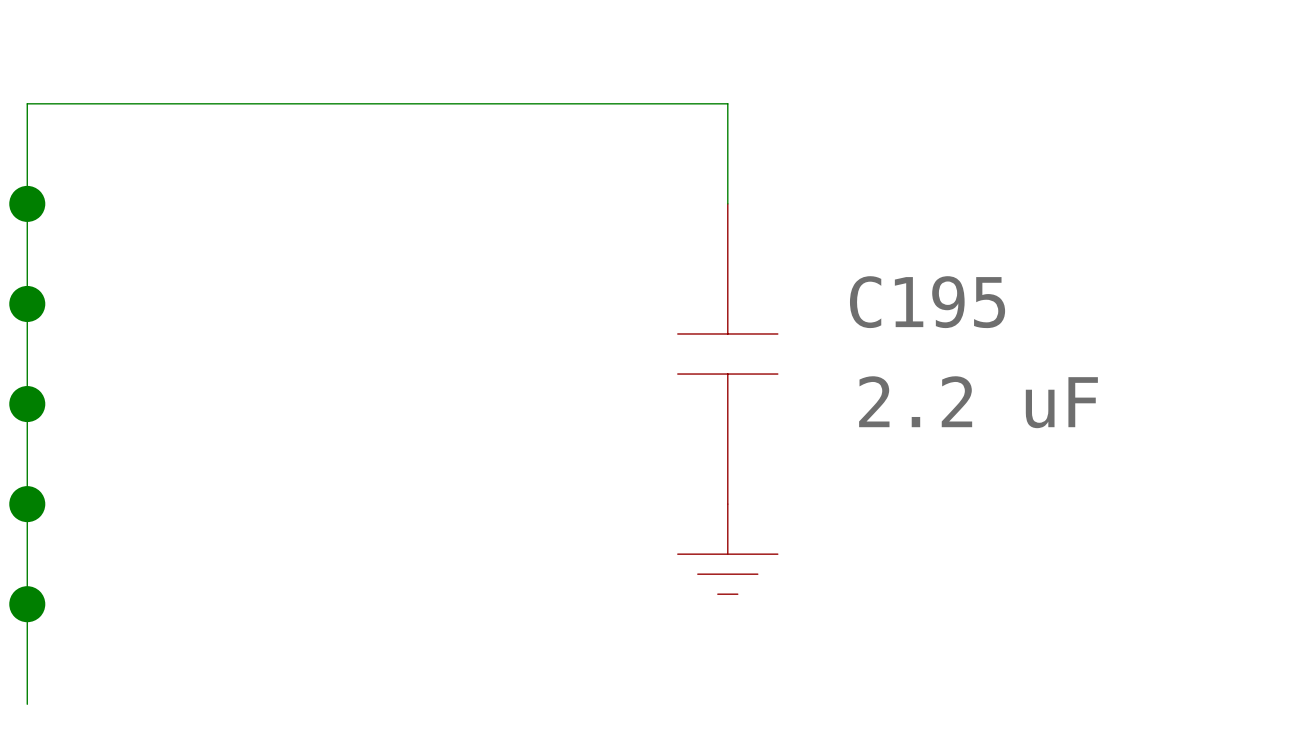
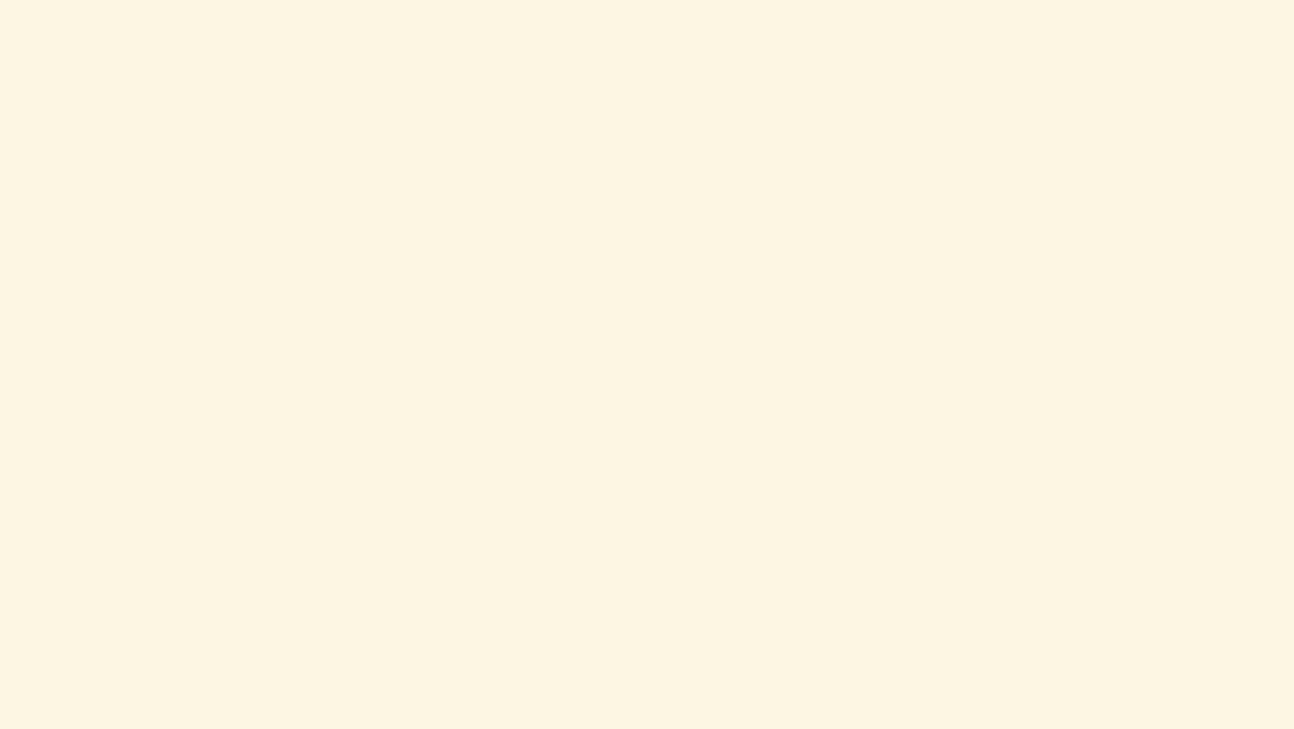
junction: (27, 203) -> none
wire: (727, 203) (727, 103) (27, 103) (27, 704) -> none
junction: (27, 303) -> none
C195: 2.2 uF (727, 354) -> none
junction: (27, 404) -> none
junction: (27, 504) -> none
power symbol: (727, 549) -> none
junction: (27, 604) -> none

